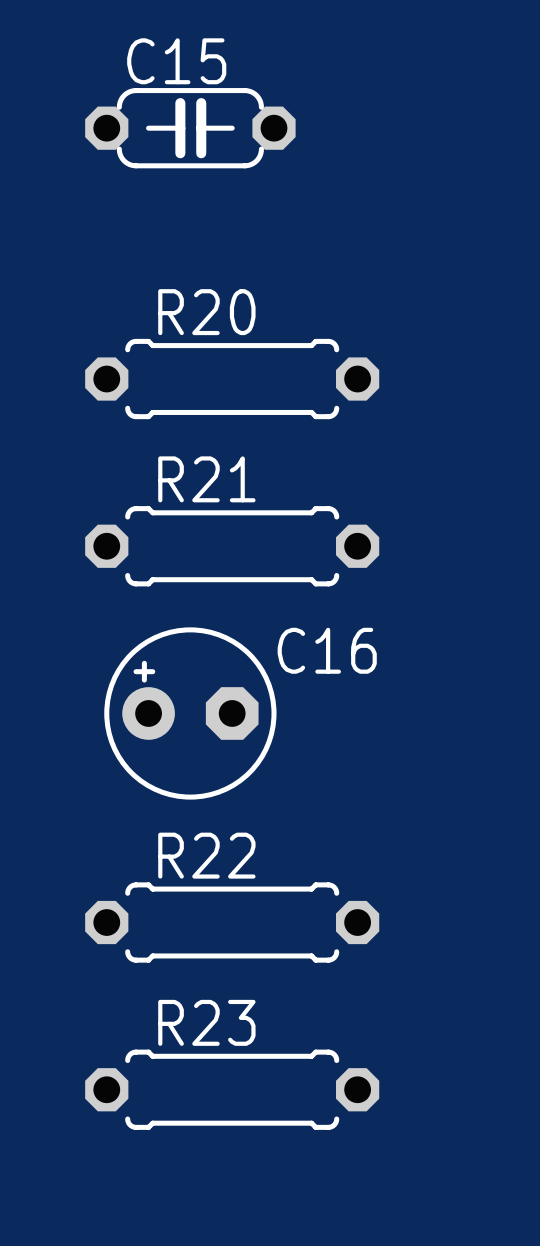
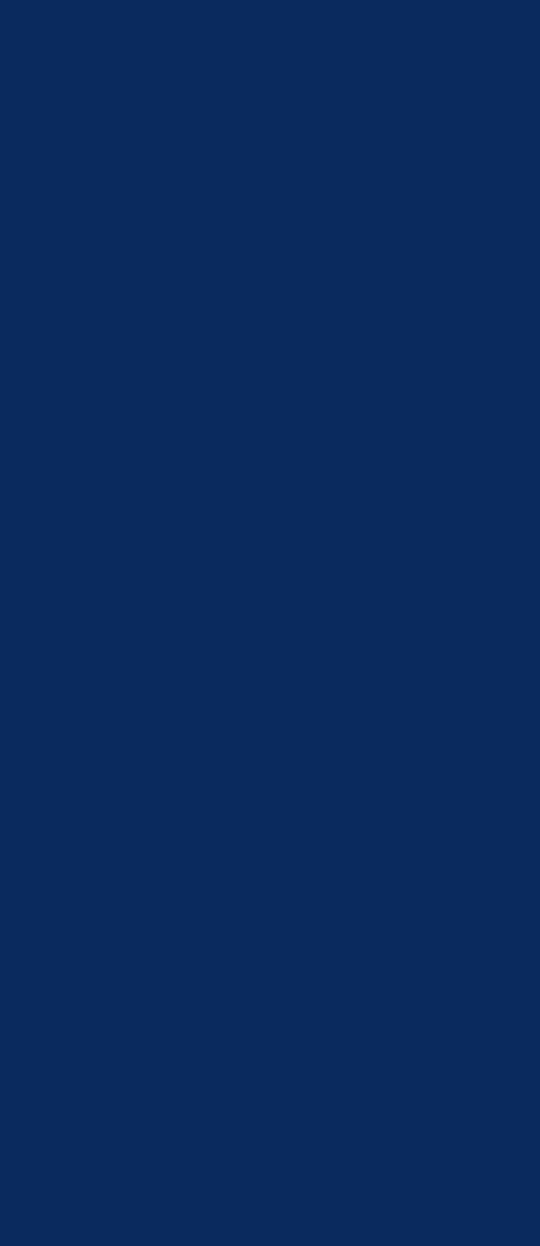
C15: (190, 128) -> none
R20: (232, 379) -> none
R21: (232, 546) -> none
C16: (190, 713) -> none
R22: (232, 922) -> none
R23: (232, 1089) -> none

